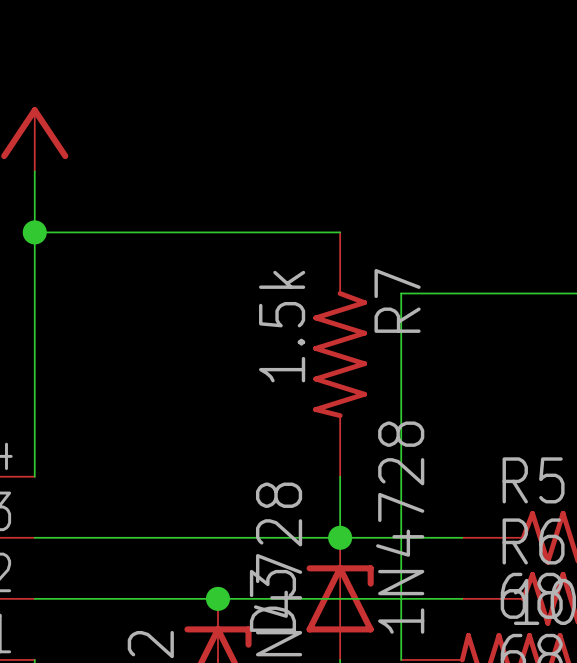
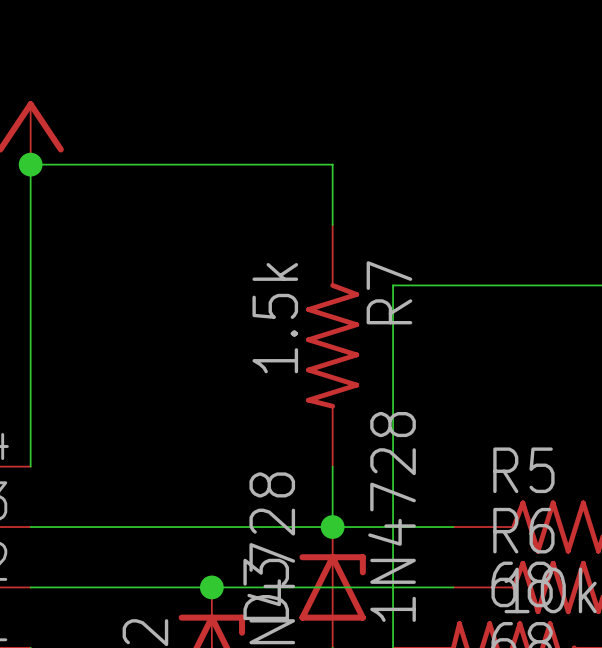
wire: (34, 232) (340, 232) -> (30, 164) (332, 164) (332, 225)
junction position: (34, 232) -> (30, 164)

